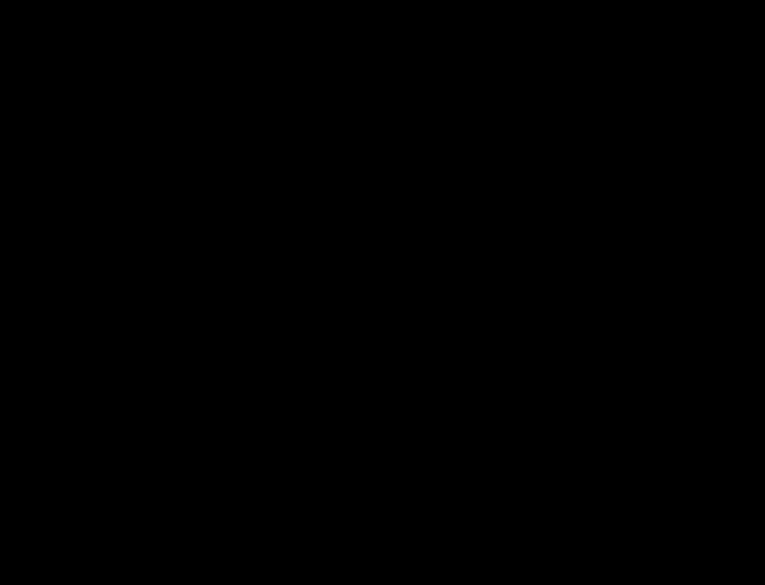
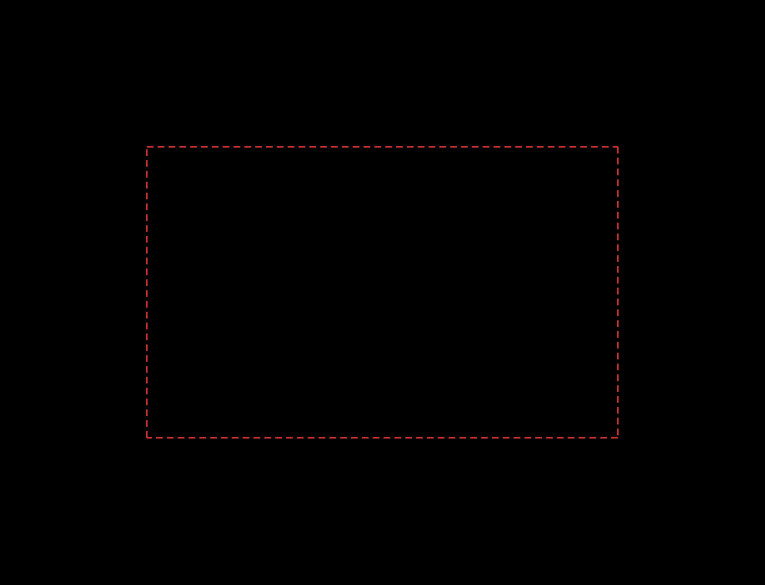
top zone outline: none -> (146, 146) (617, 146) (617, 437) (146, 437) (146, 146)

